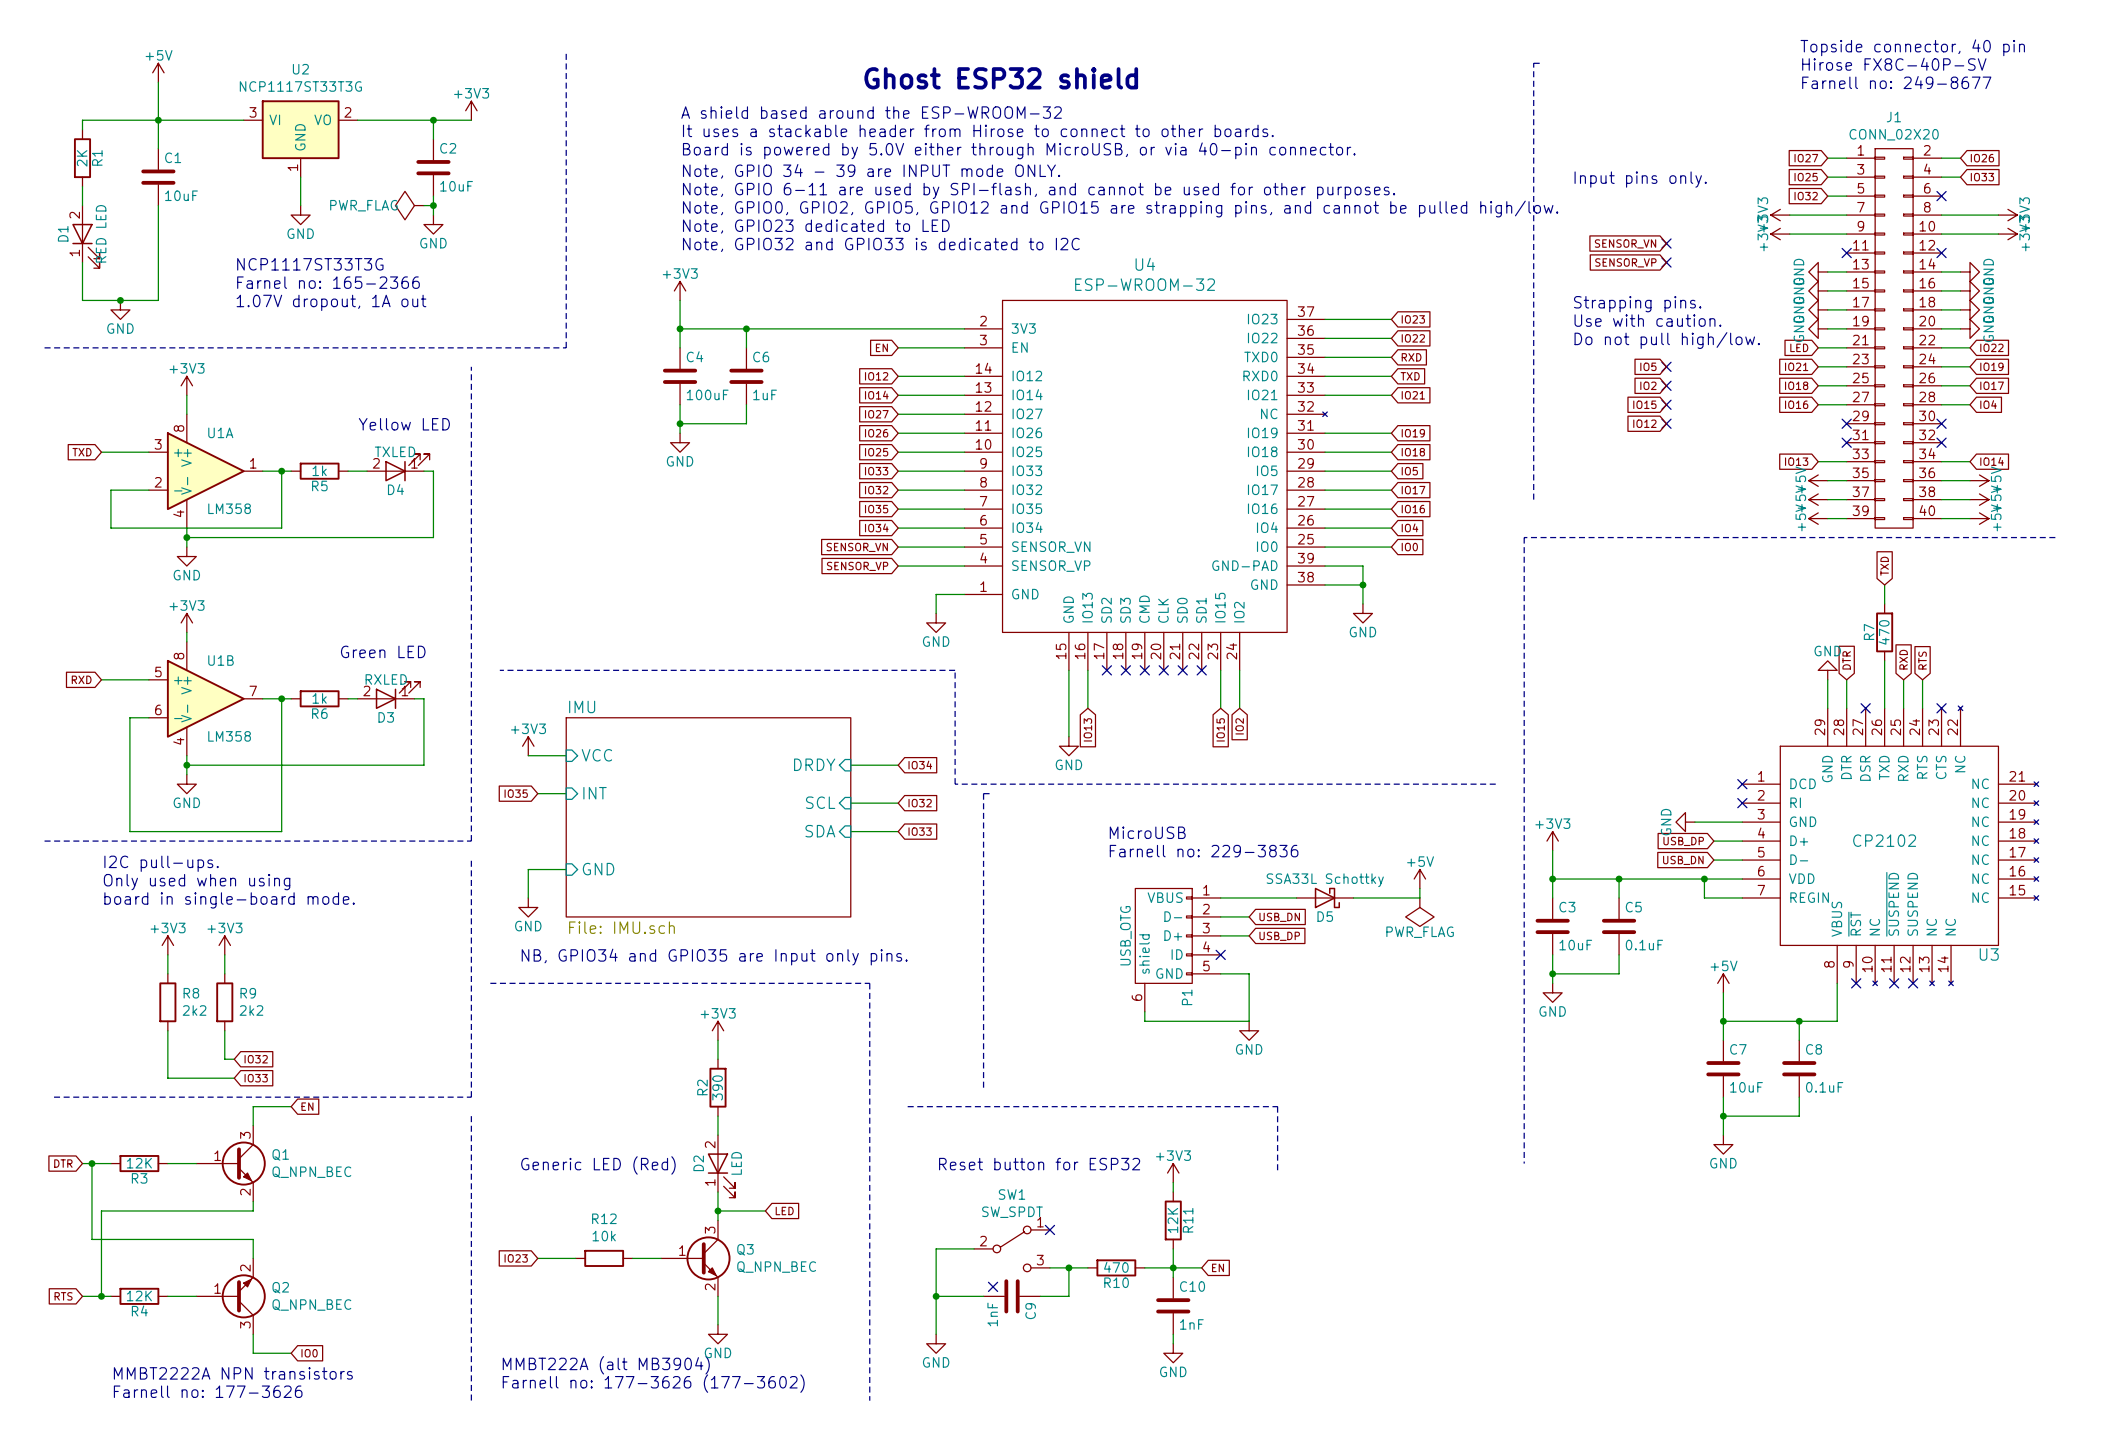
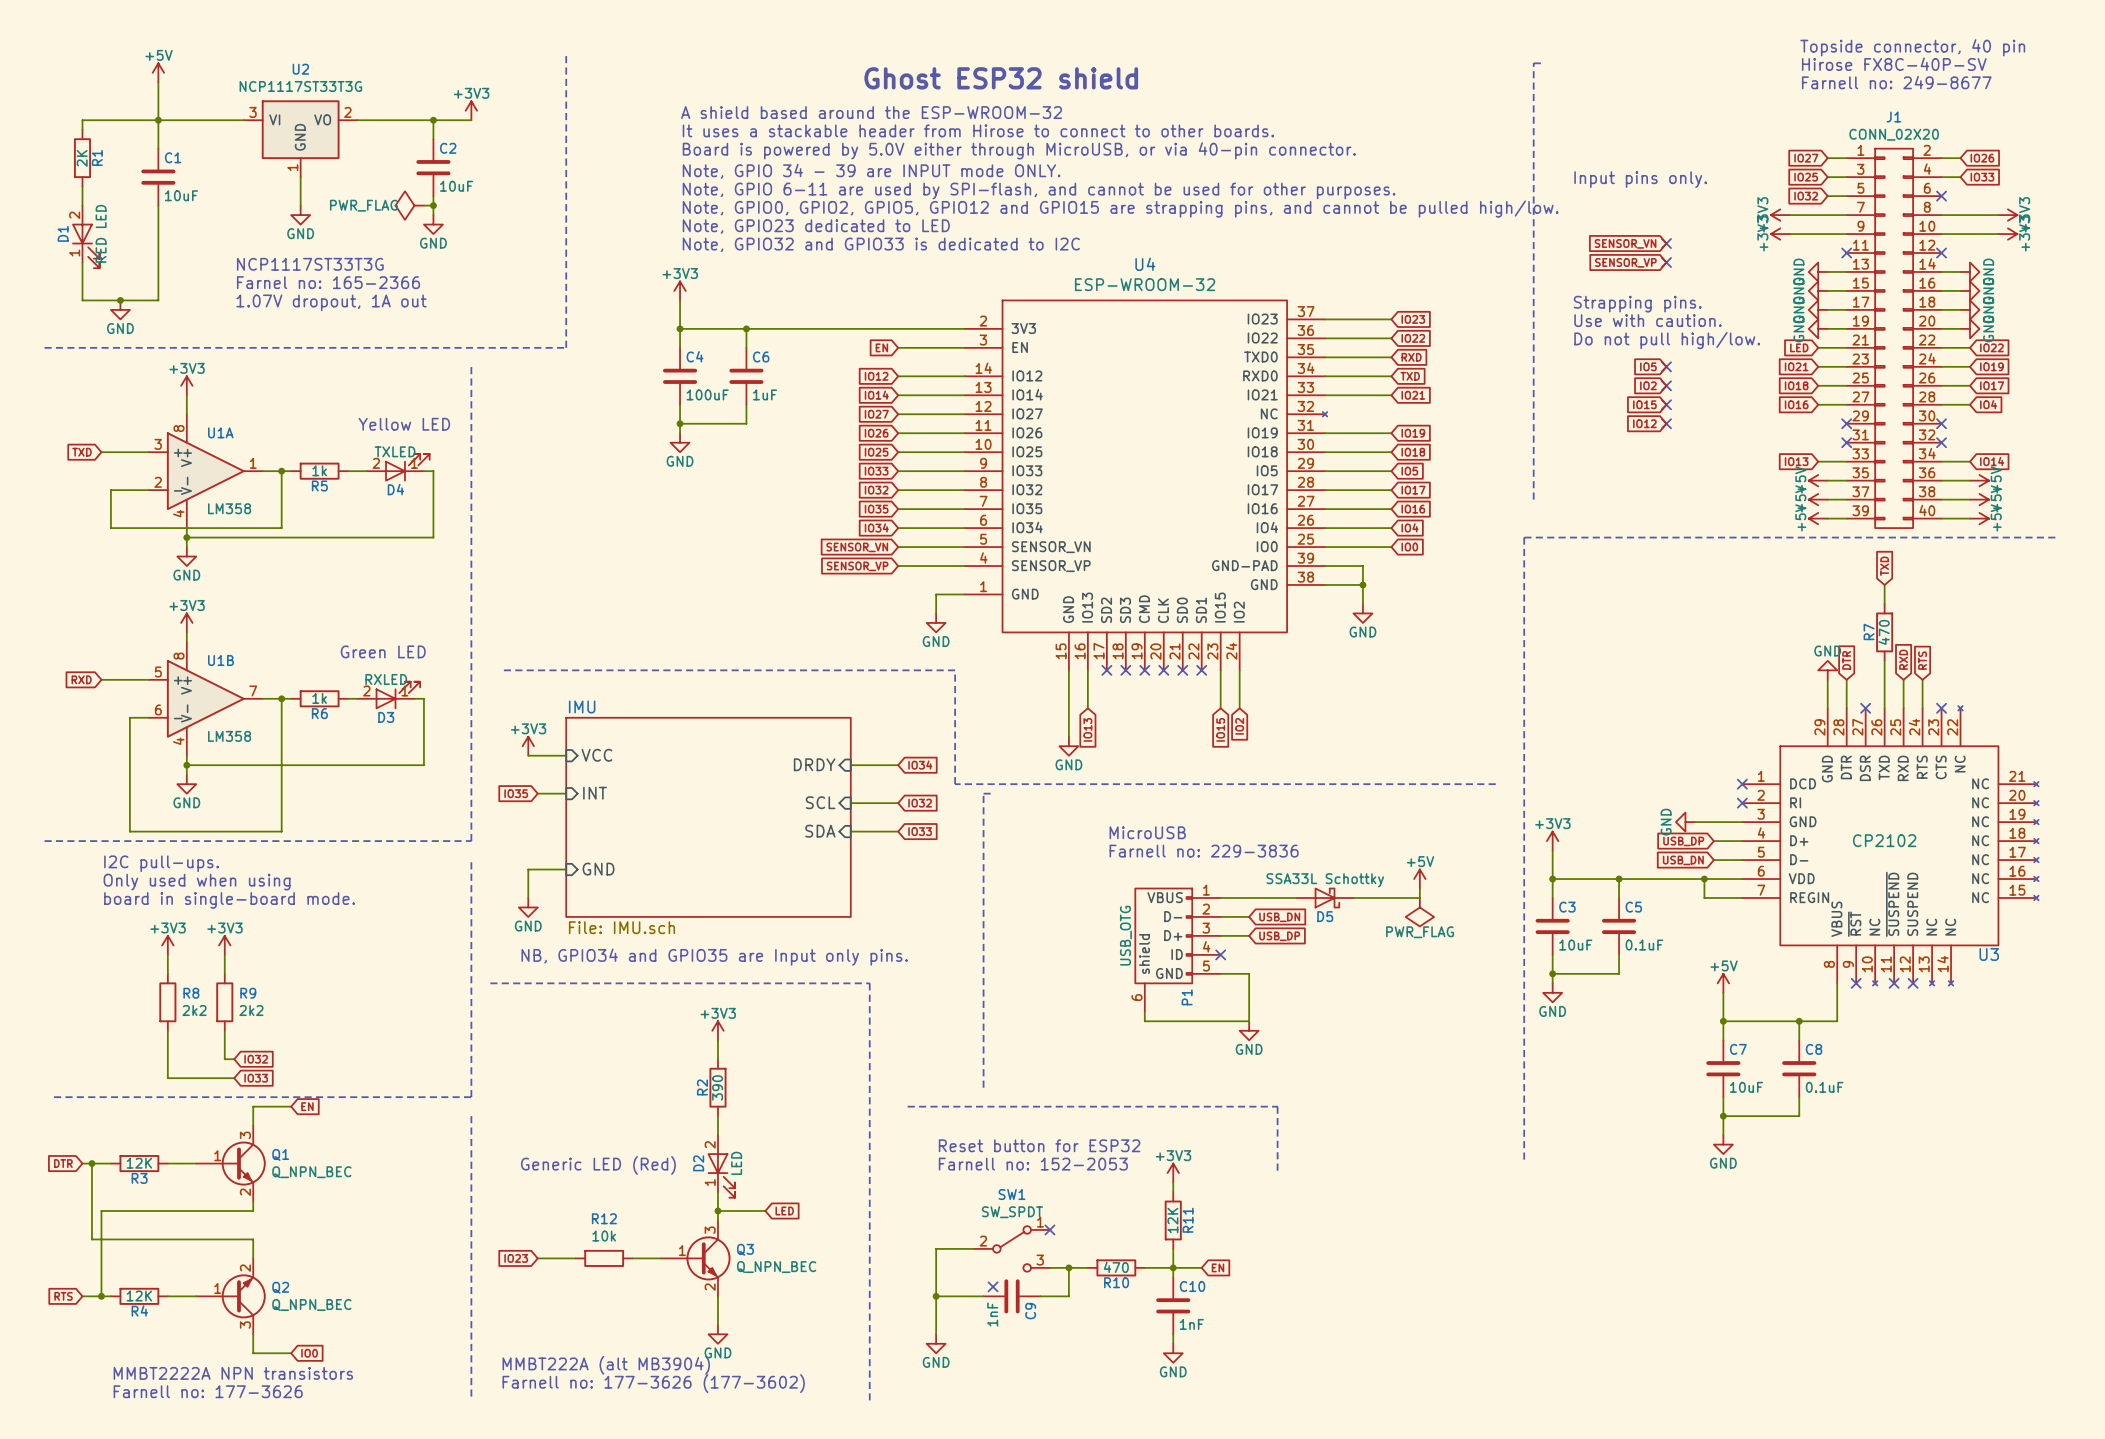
text: none -> Reset button for ESP32 (1039, 1145)
text: Reset button for ESP32 (1039, 1164) -> Farnell no: 152-2053 (1033, 1164)

